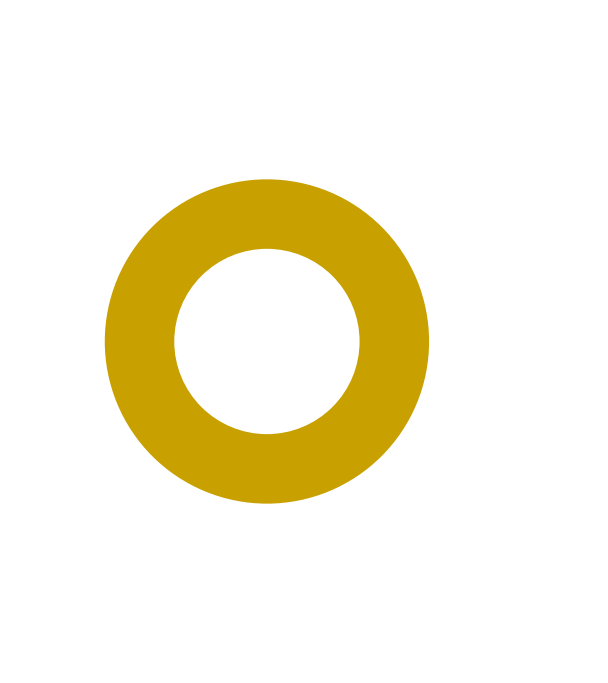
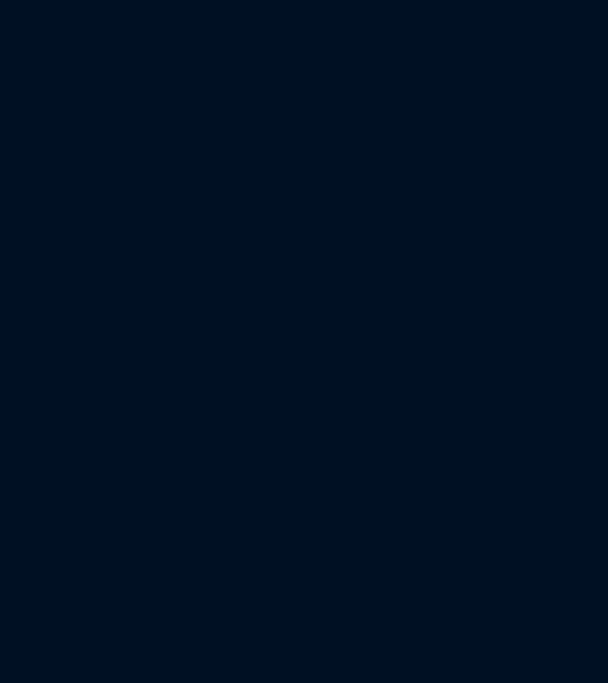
part: (266, 341) -> none

